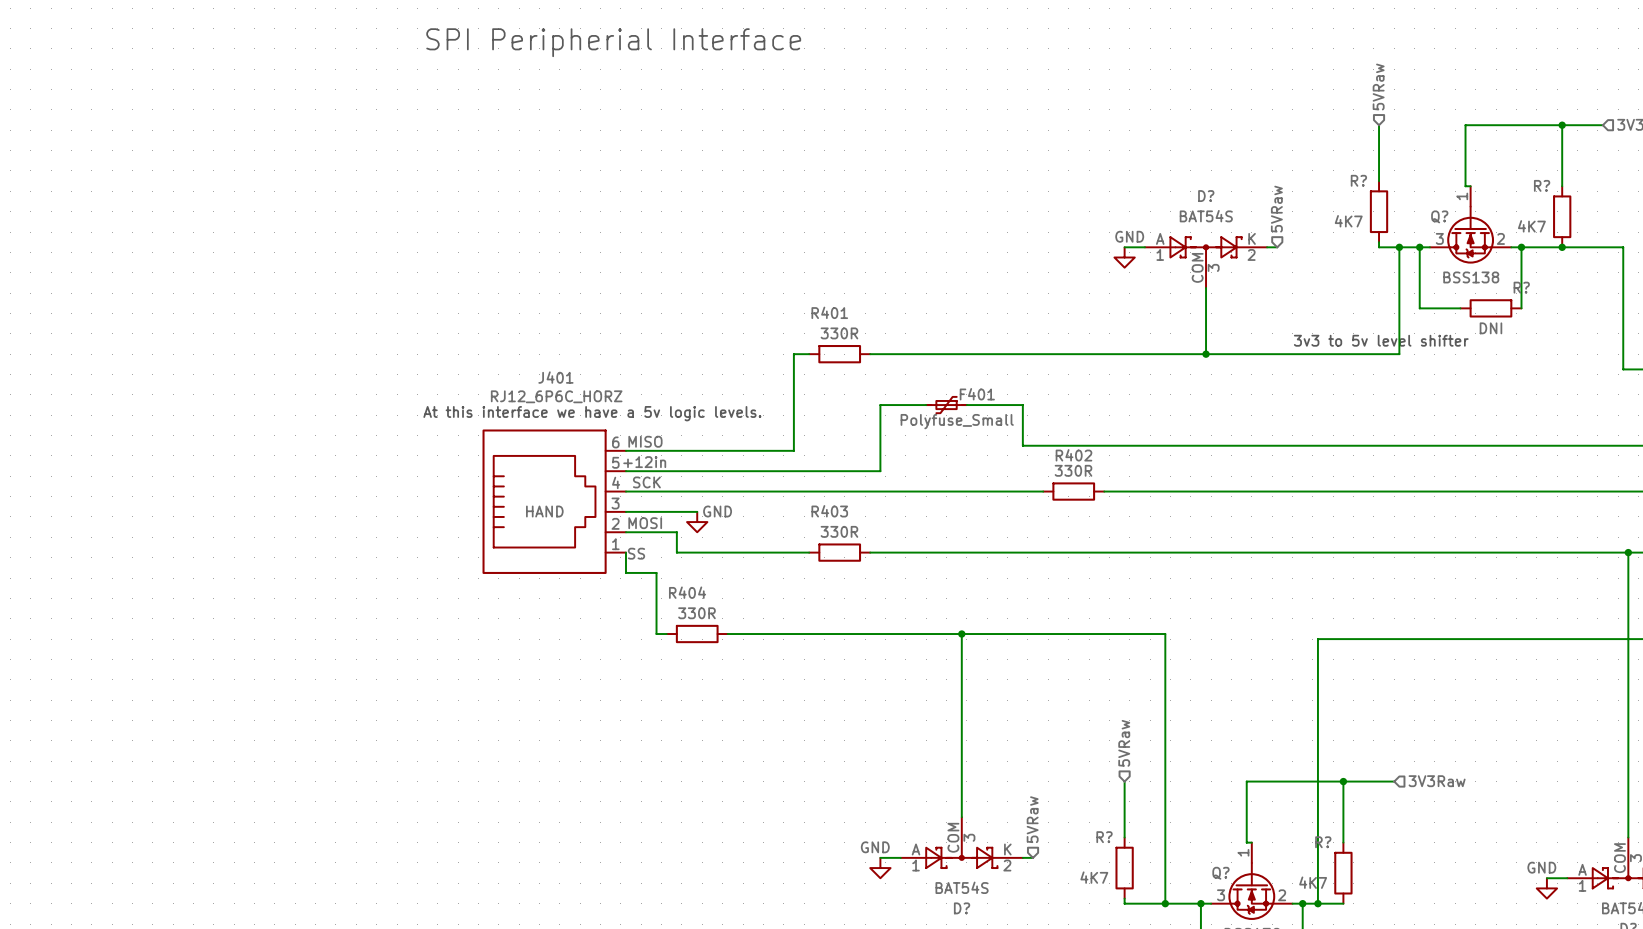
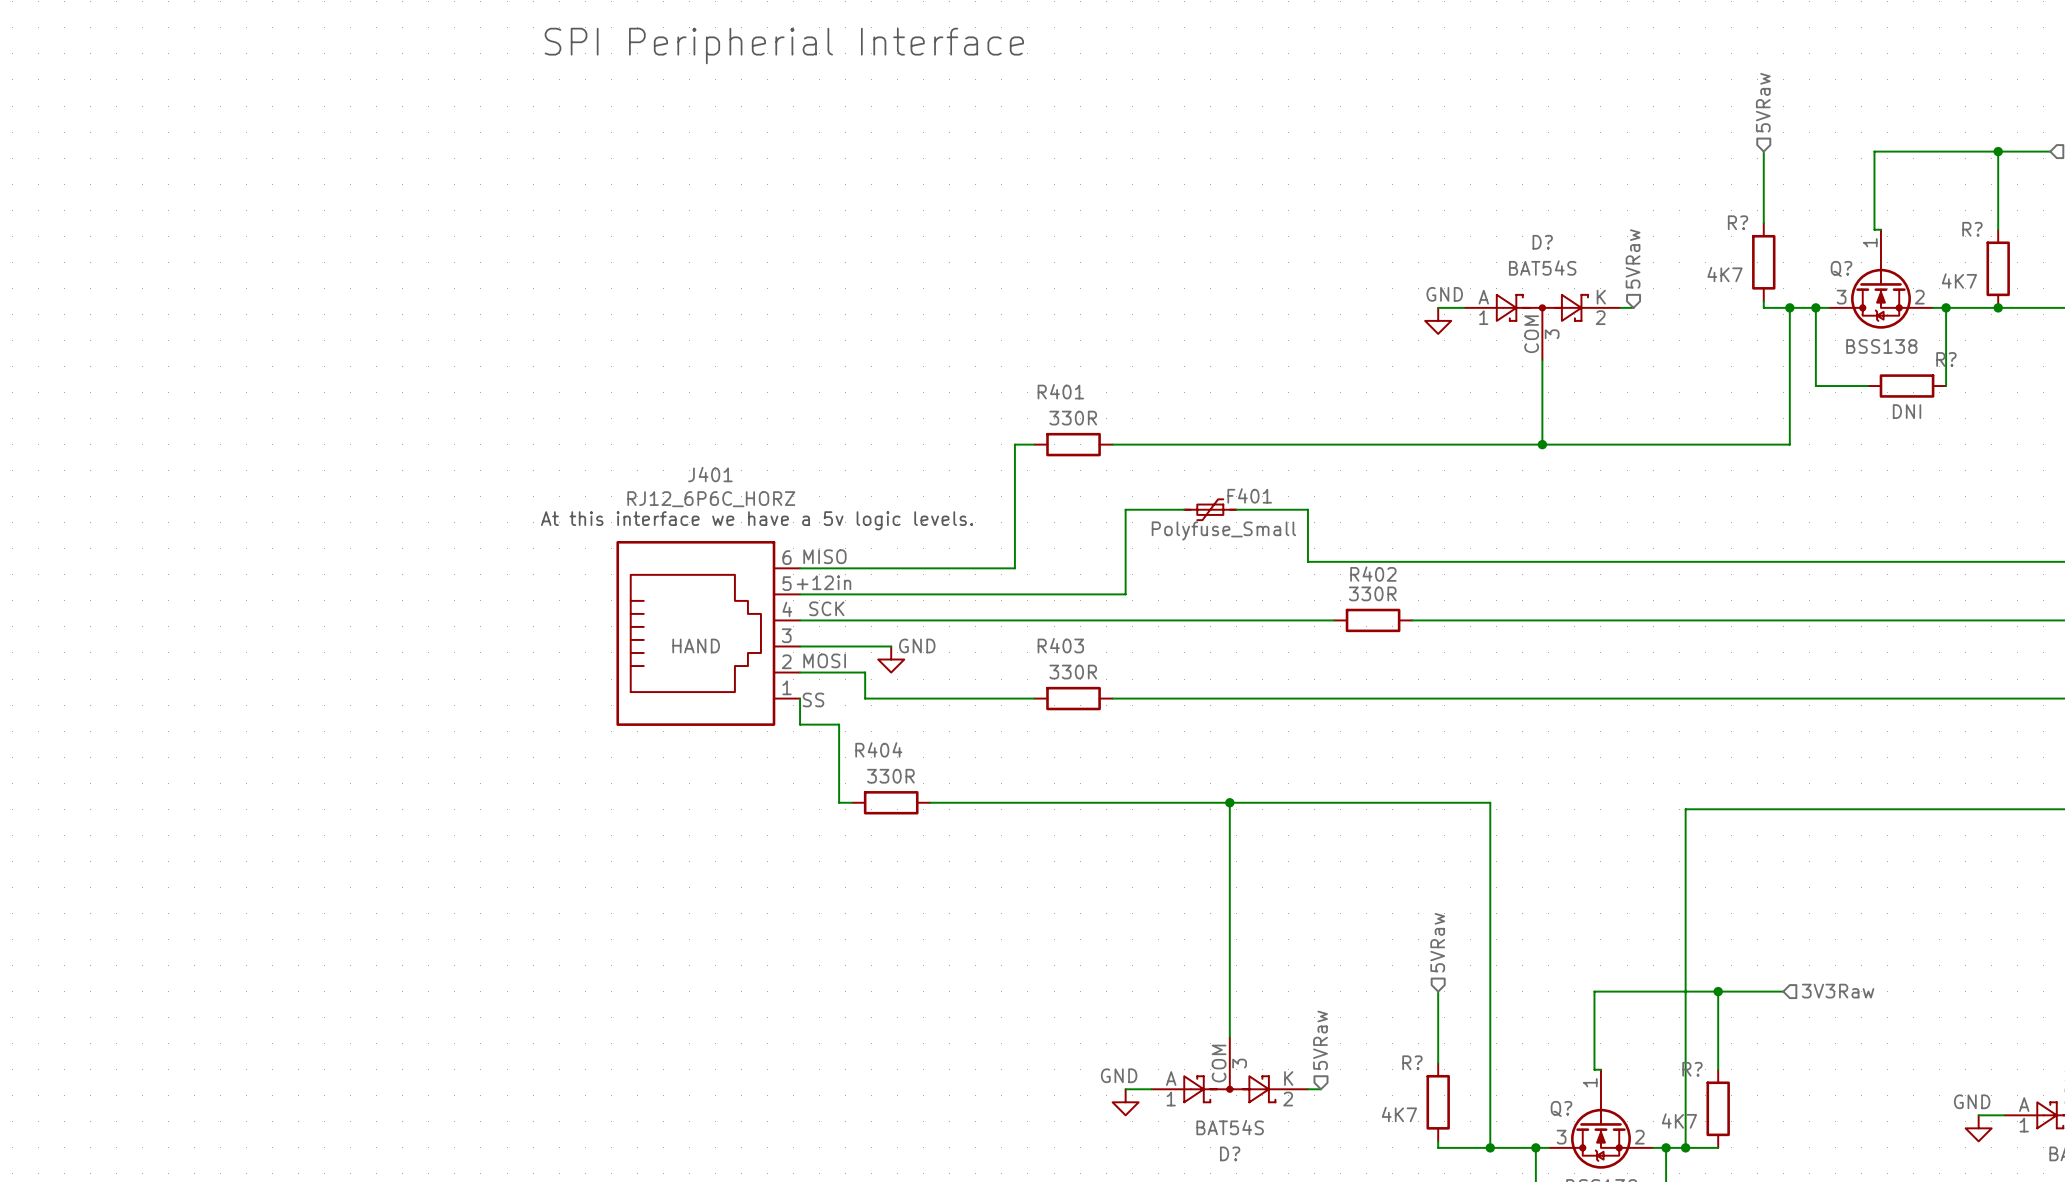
text: 3v3 to 5v level shifter (1381, 340) -> none

